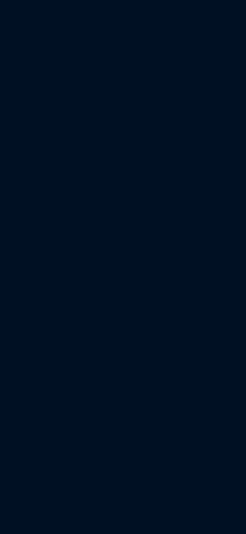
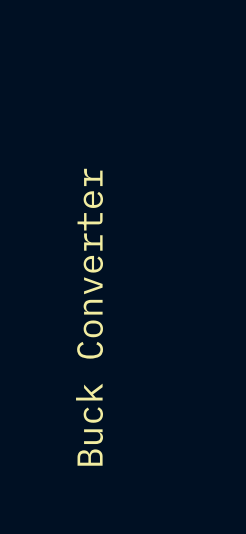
text: none -> Buck Converter (89, 317)

